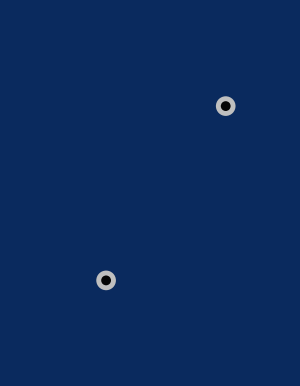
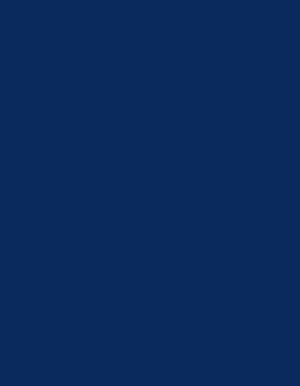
via: (225, 106) -> none
via: (106, 280) -> none

